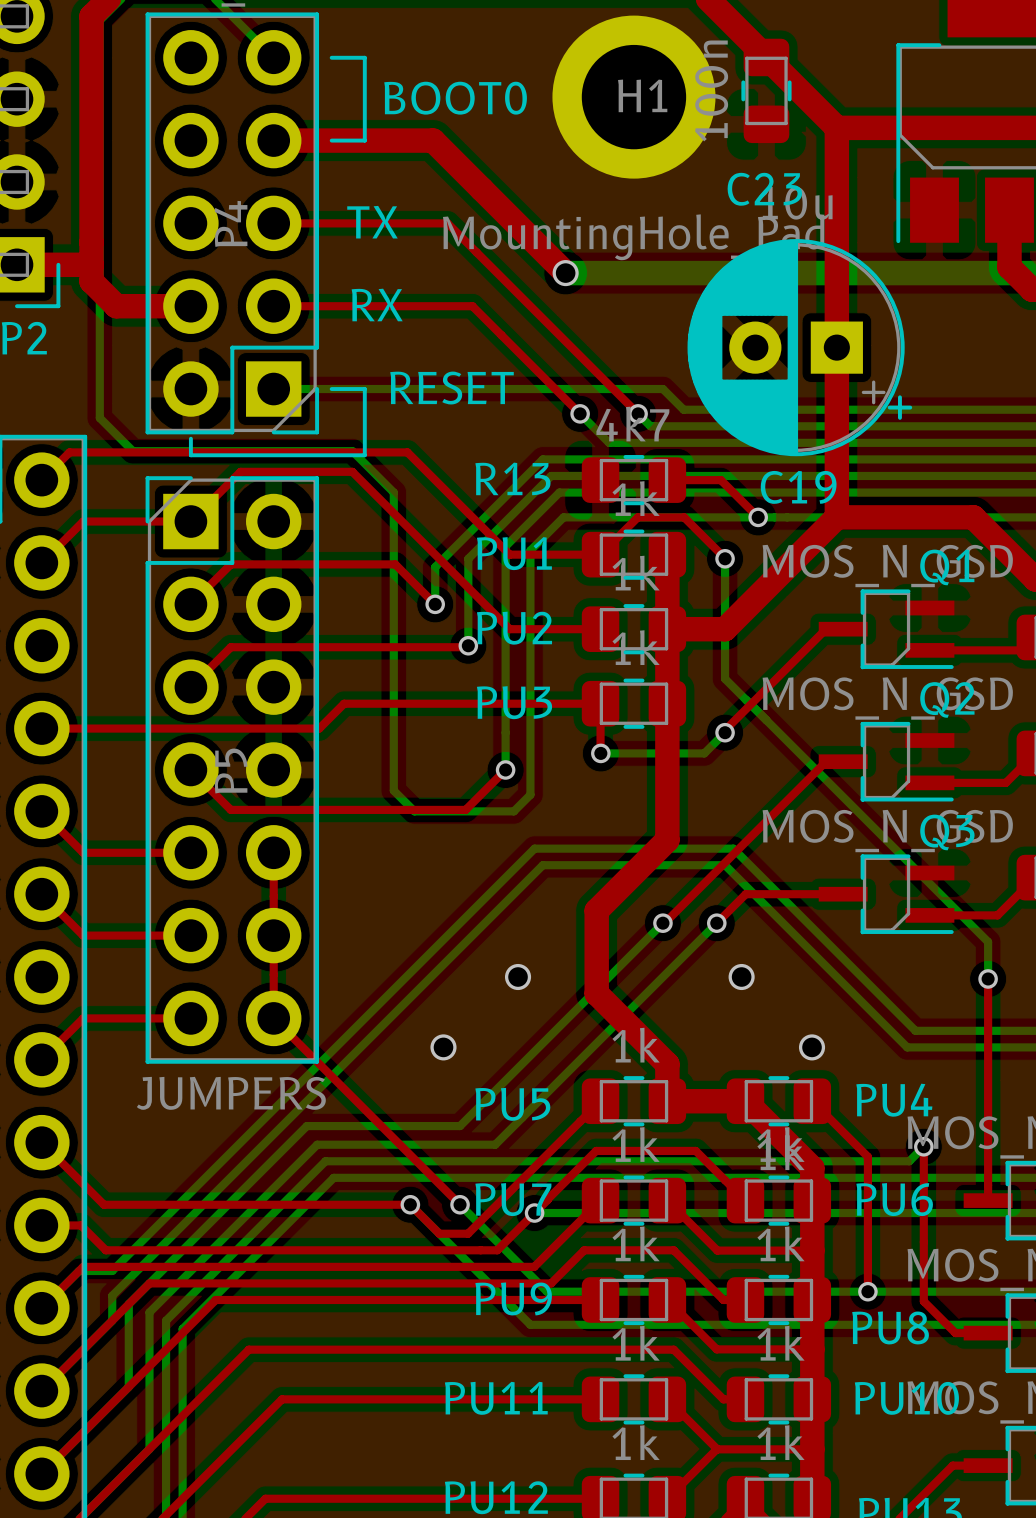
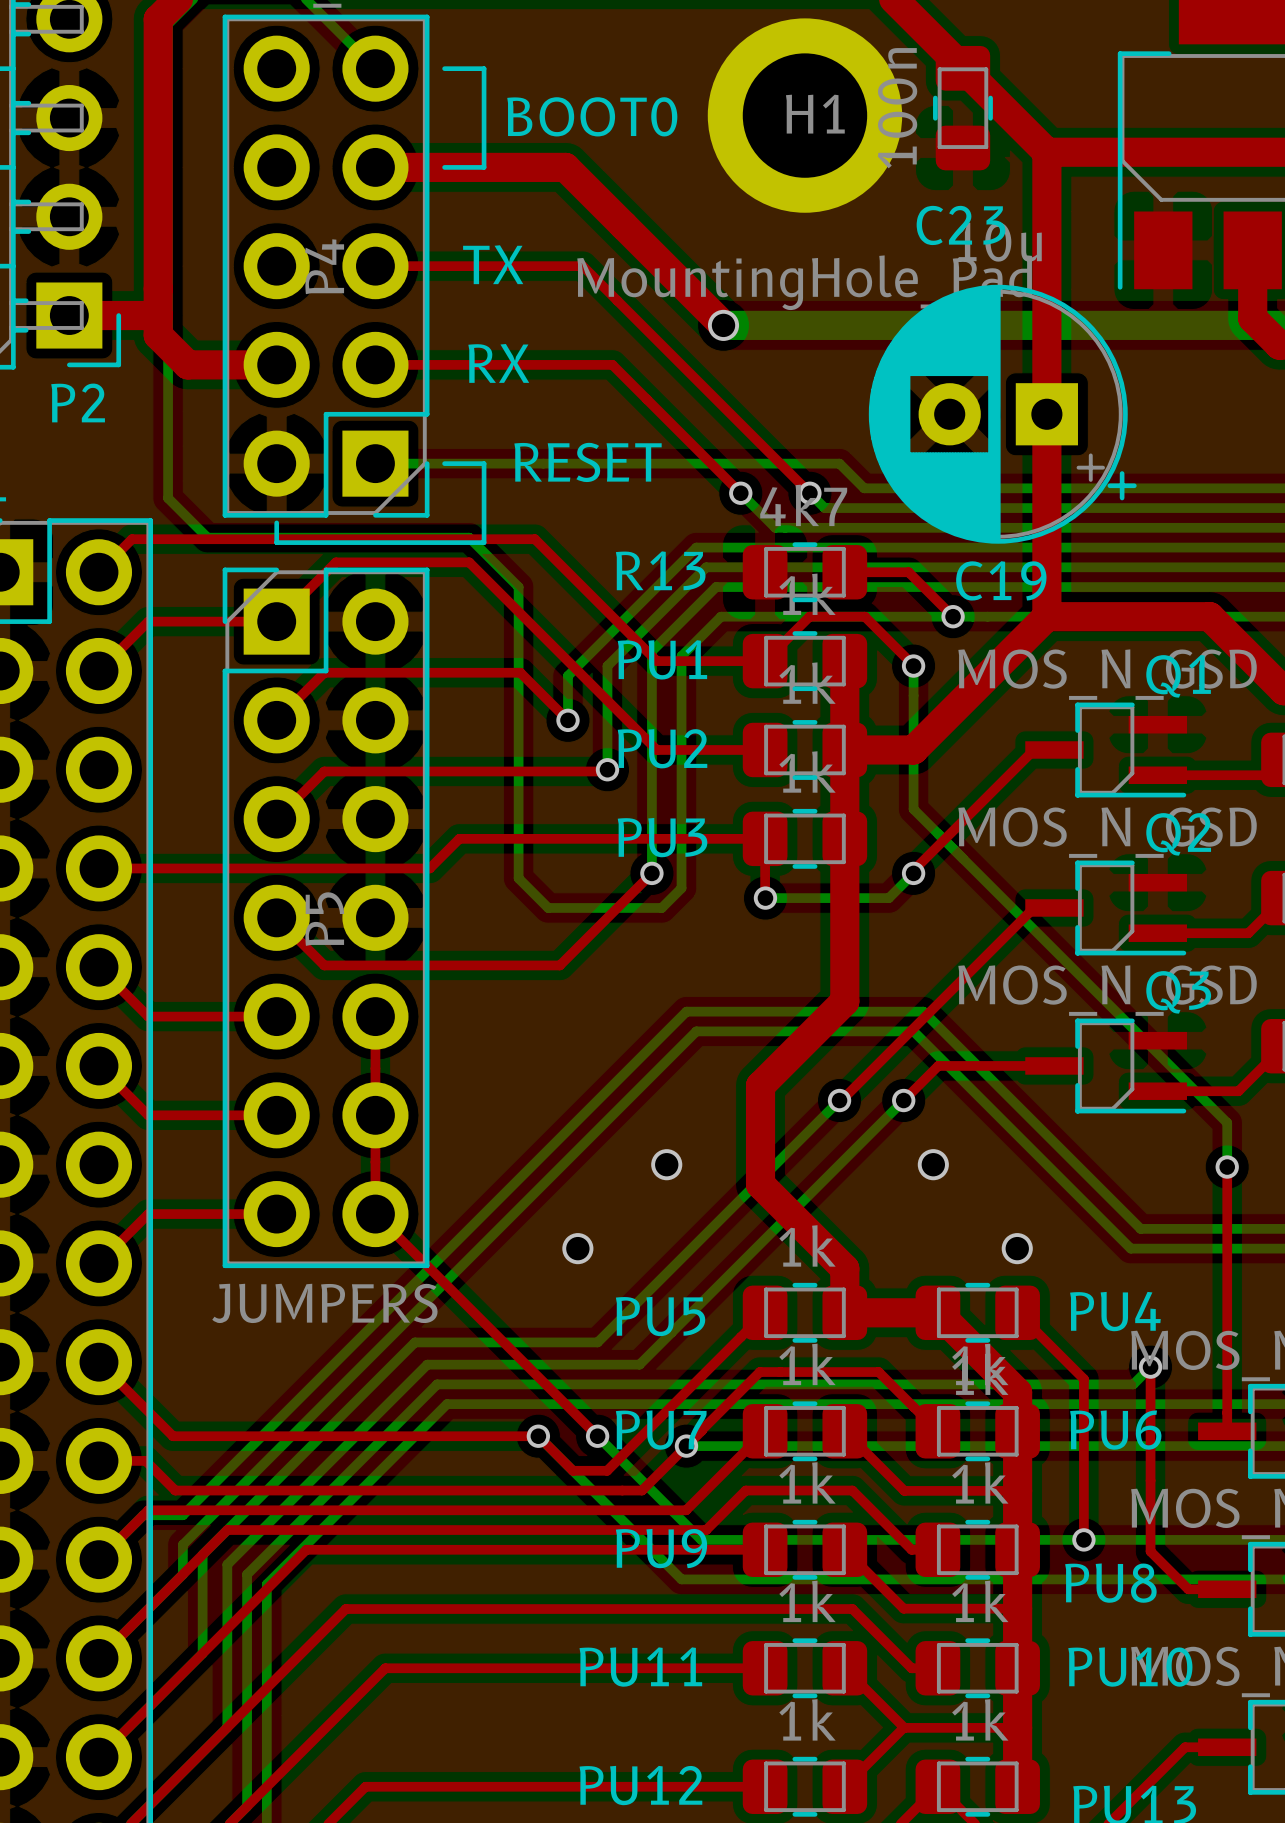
bottom track: (505, 732) (505, 769) -> none
bottom track: (393, 736) (393, 790) (414, 811) (513, 811) (530, 794) (530, 745) -> (518, 878) (548, 907) (661, 907) (681, 888)
top track: (505, 769) (465, 809) (428, 809) -> (651, 873) (559, 965)
via position: (505, 769) -> (651, 873)

